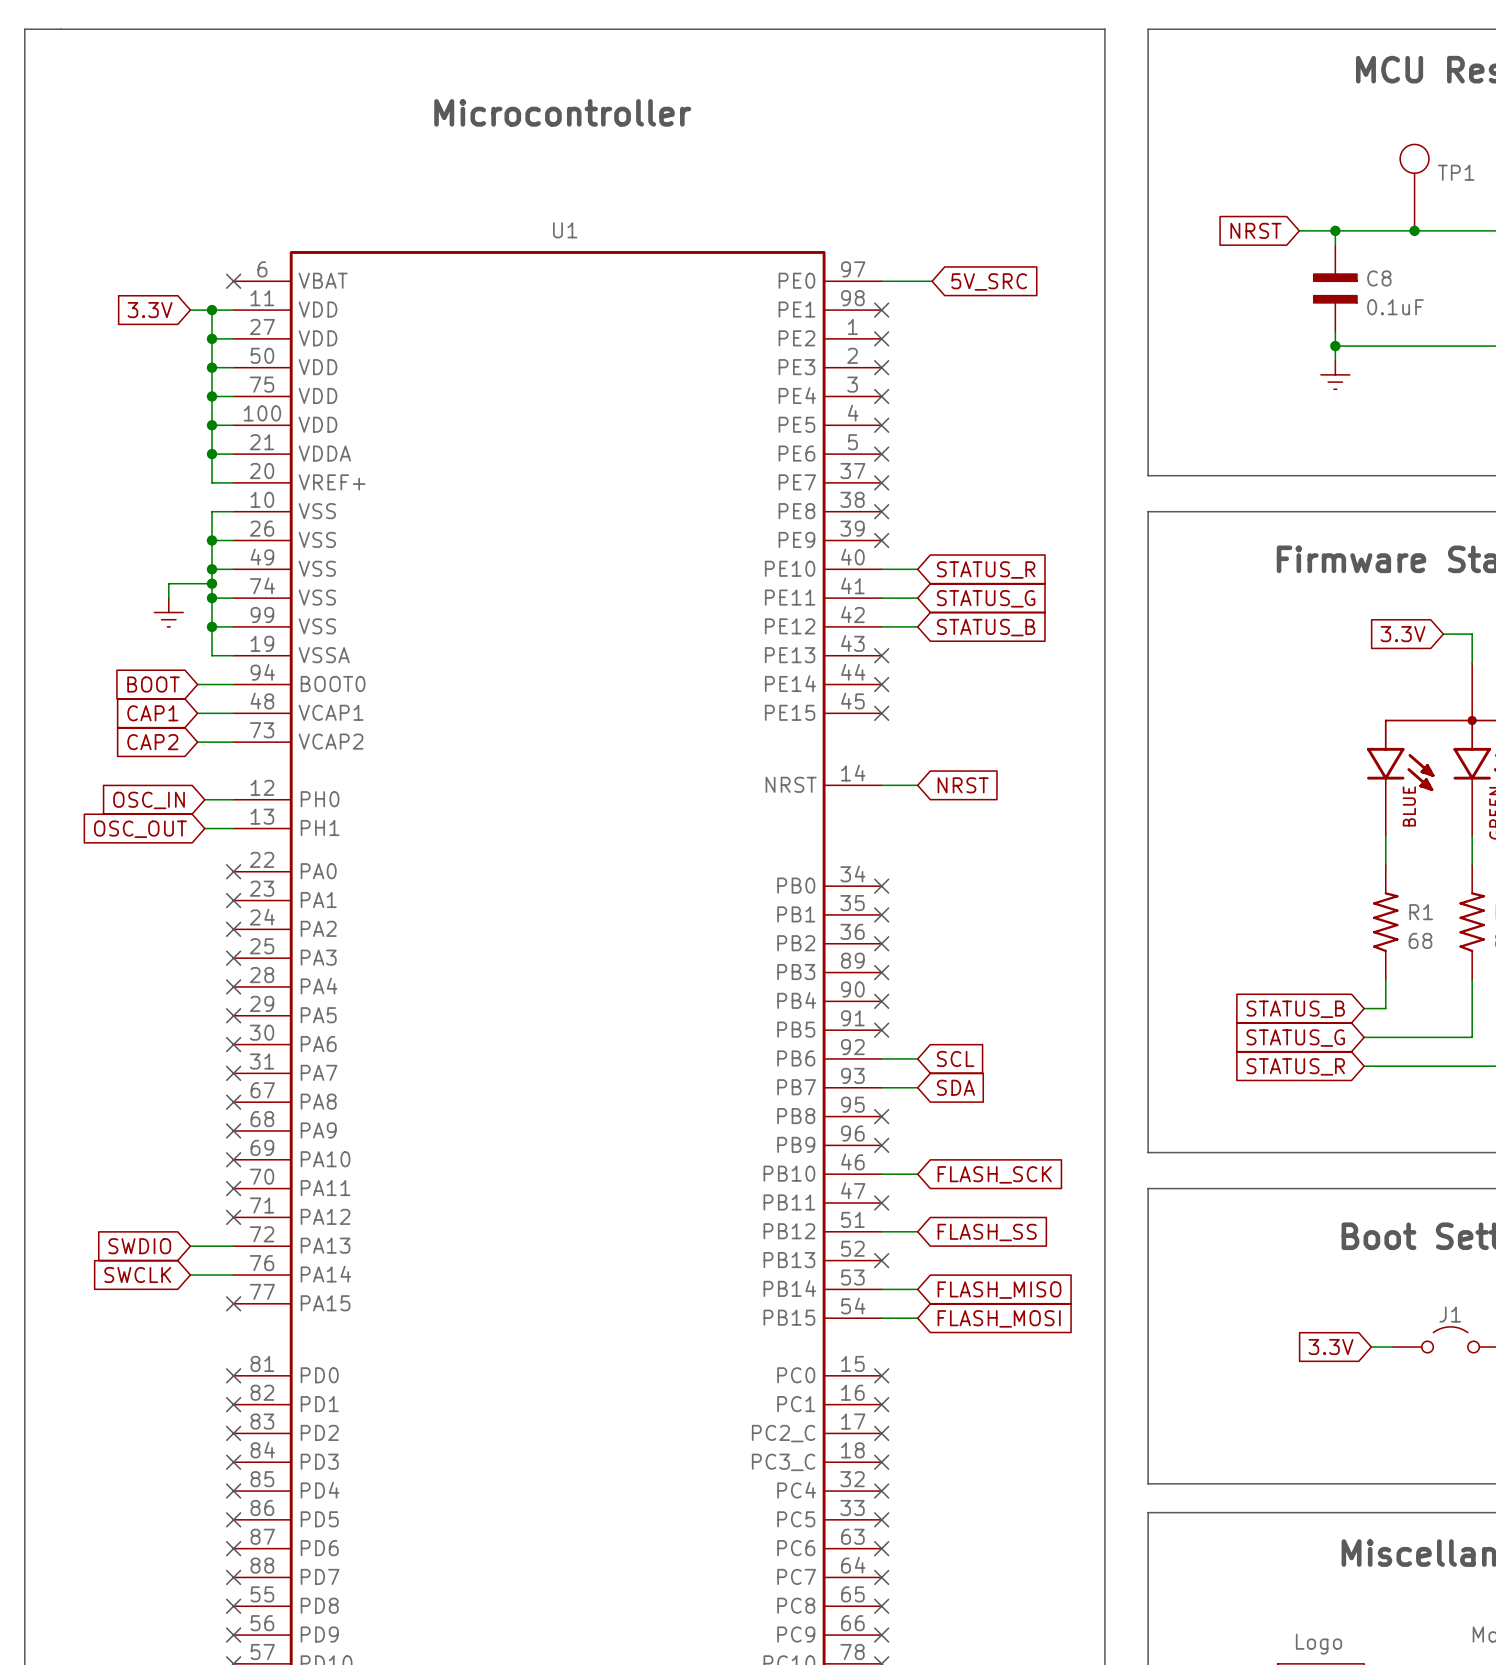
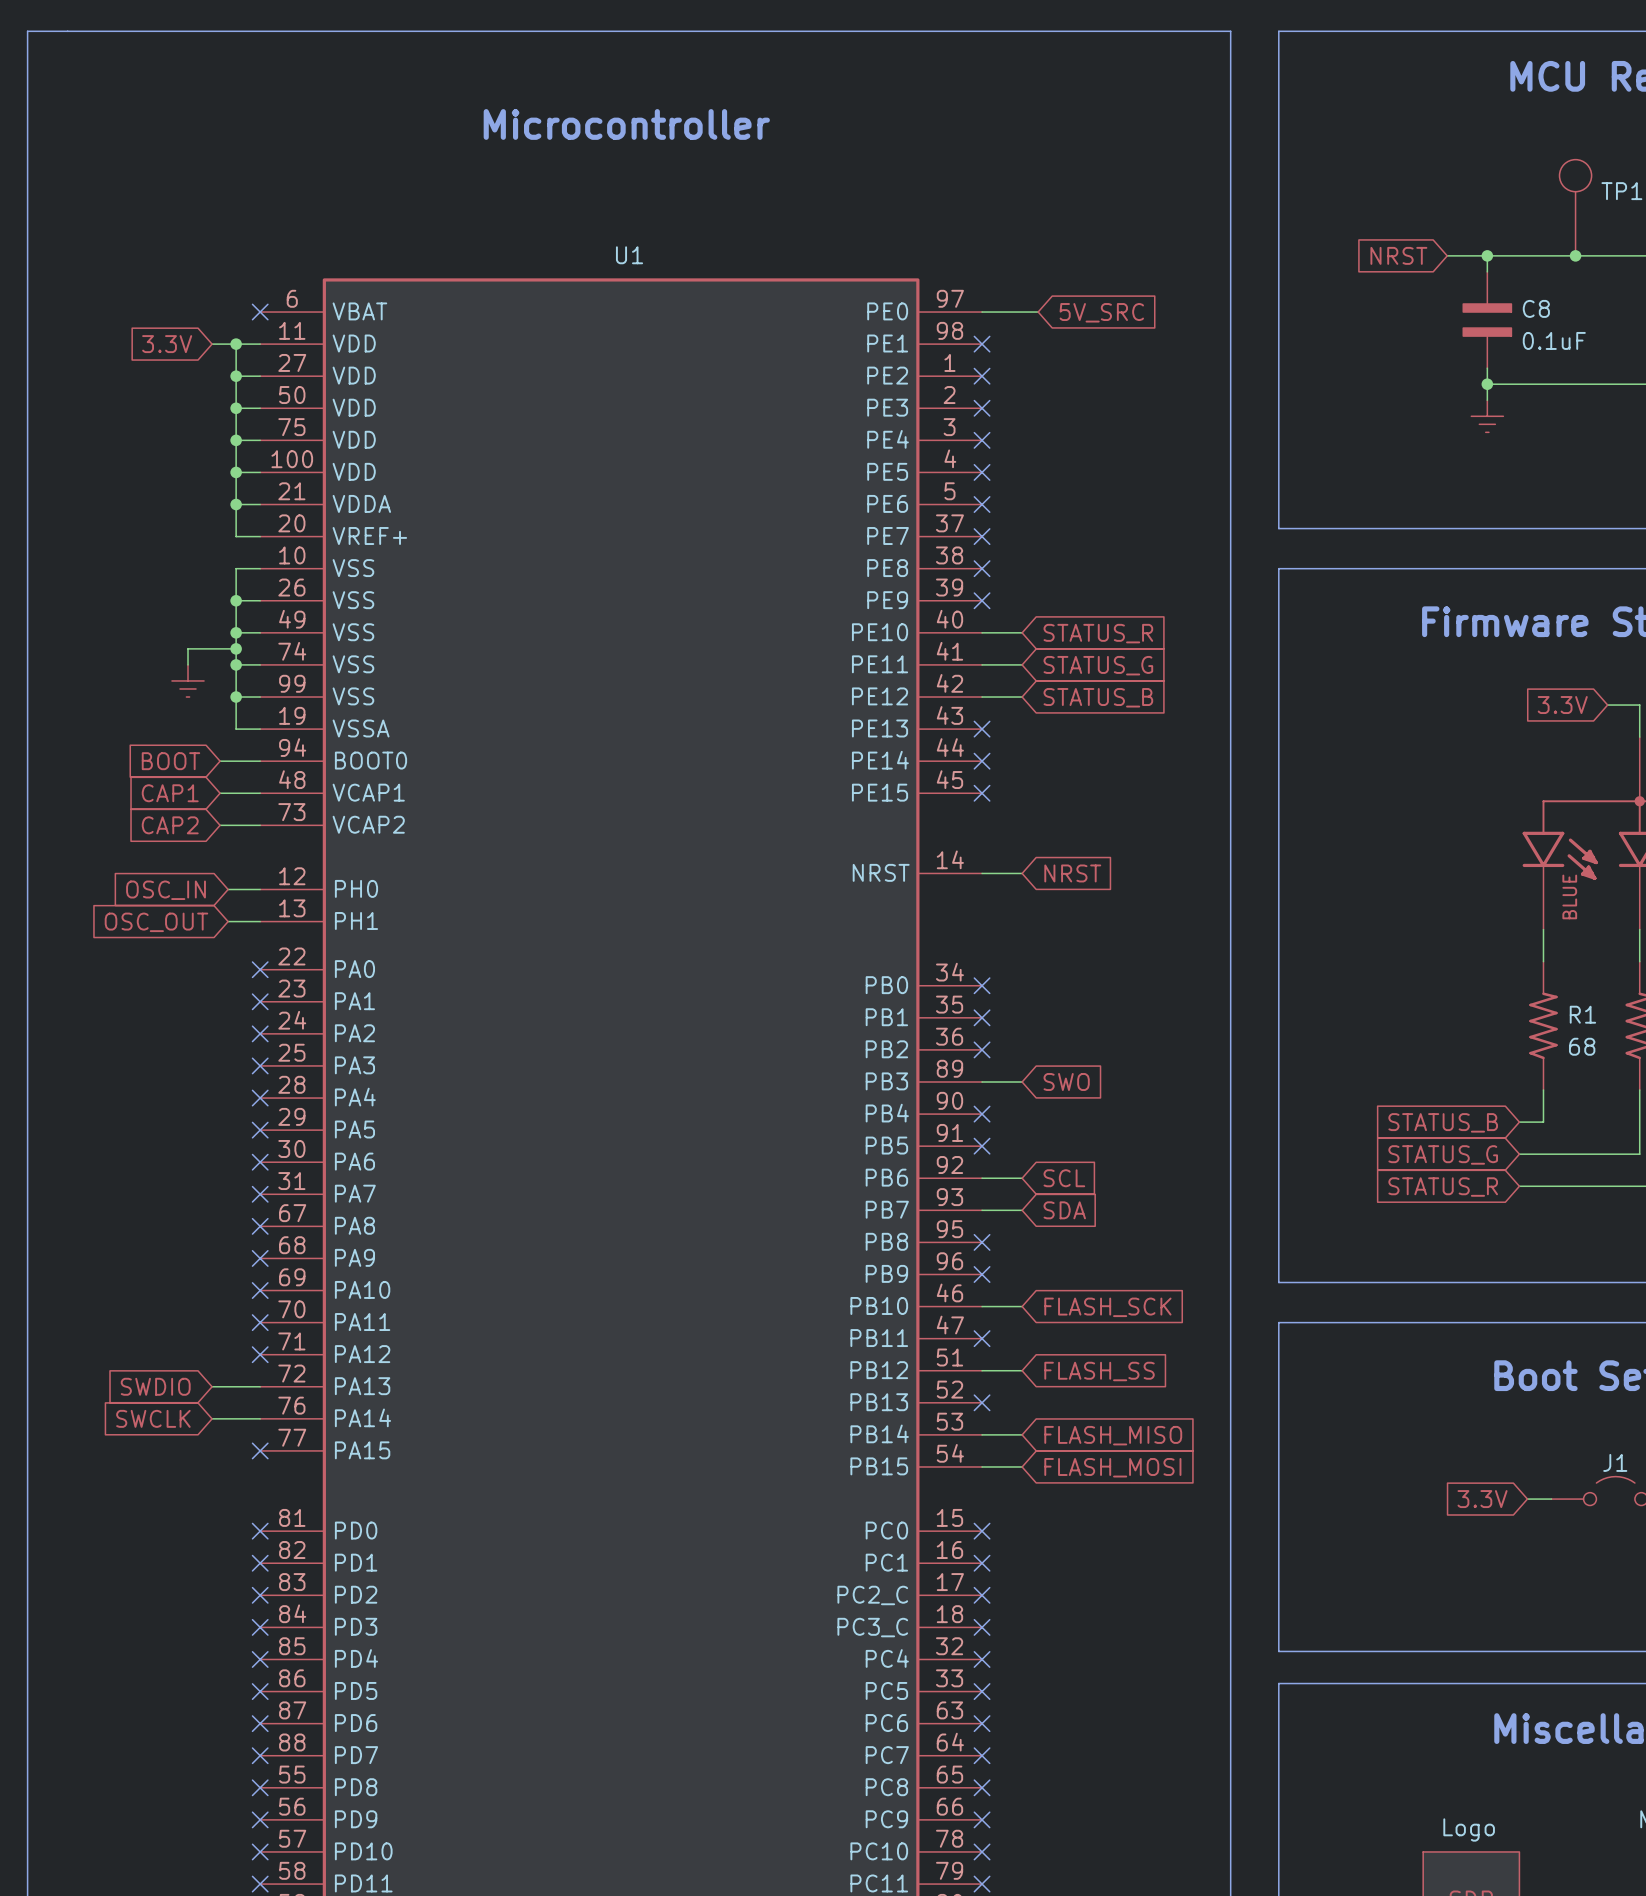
wire: none -> (982, 1081) (1022, 1081)
no-connect mark: (881, 972) -> none
global label: none -> SWO (1066, 1081)

